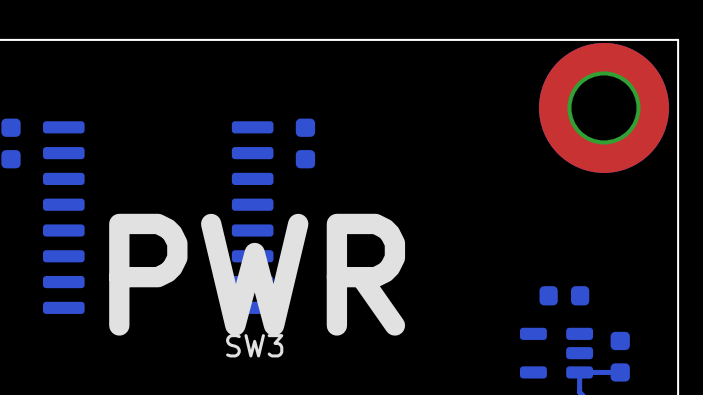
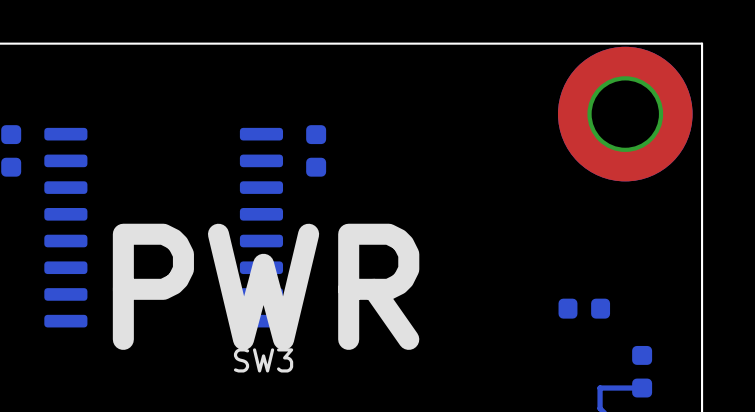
part: (556, 353) -> none

